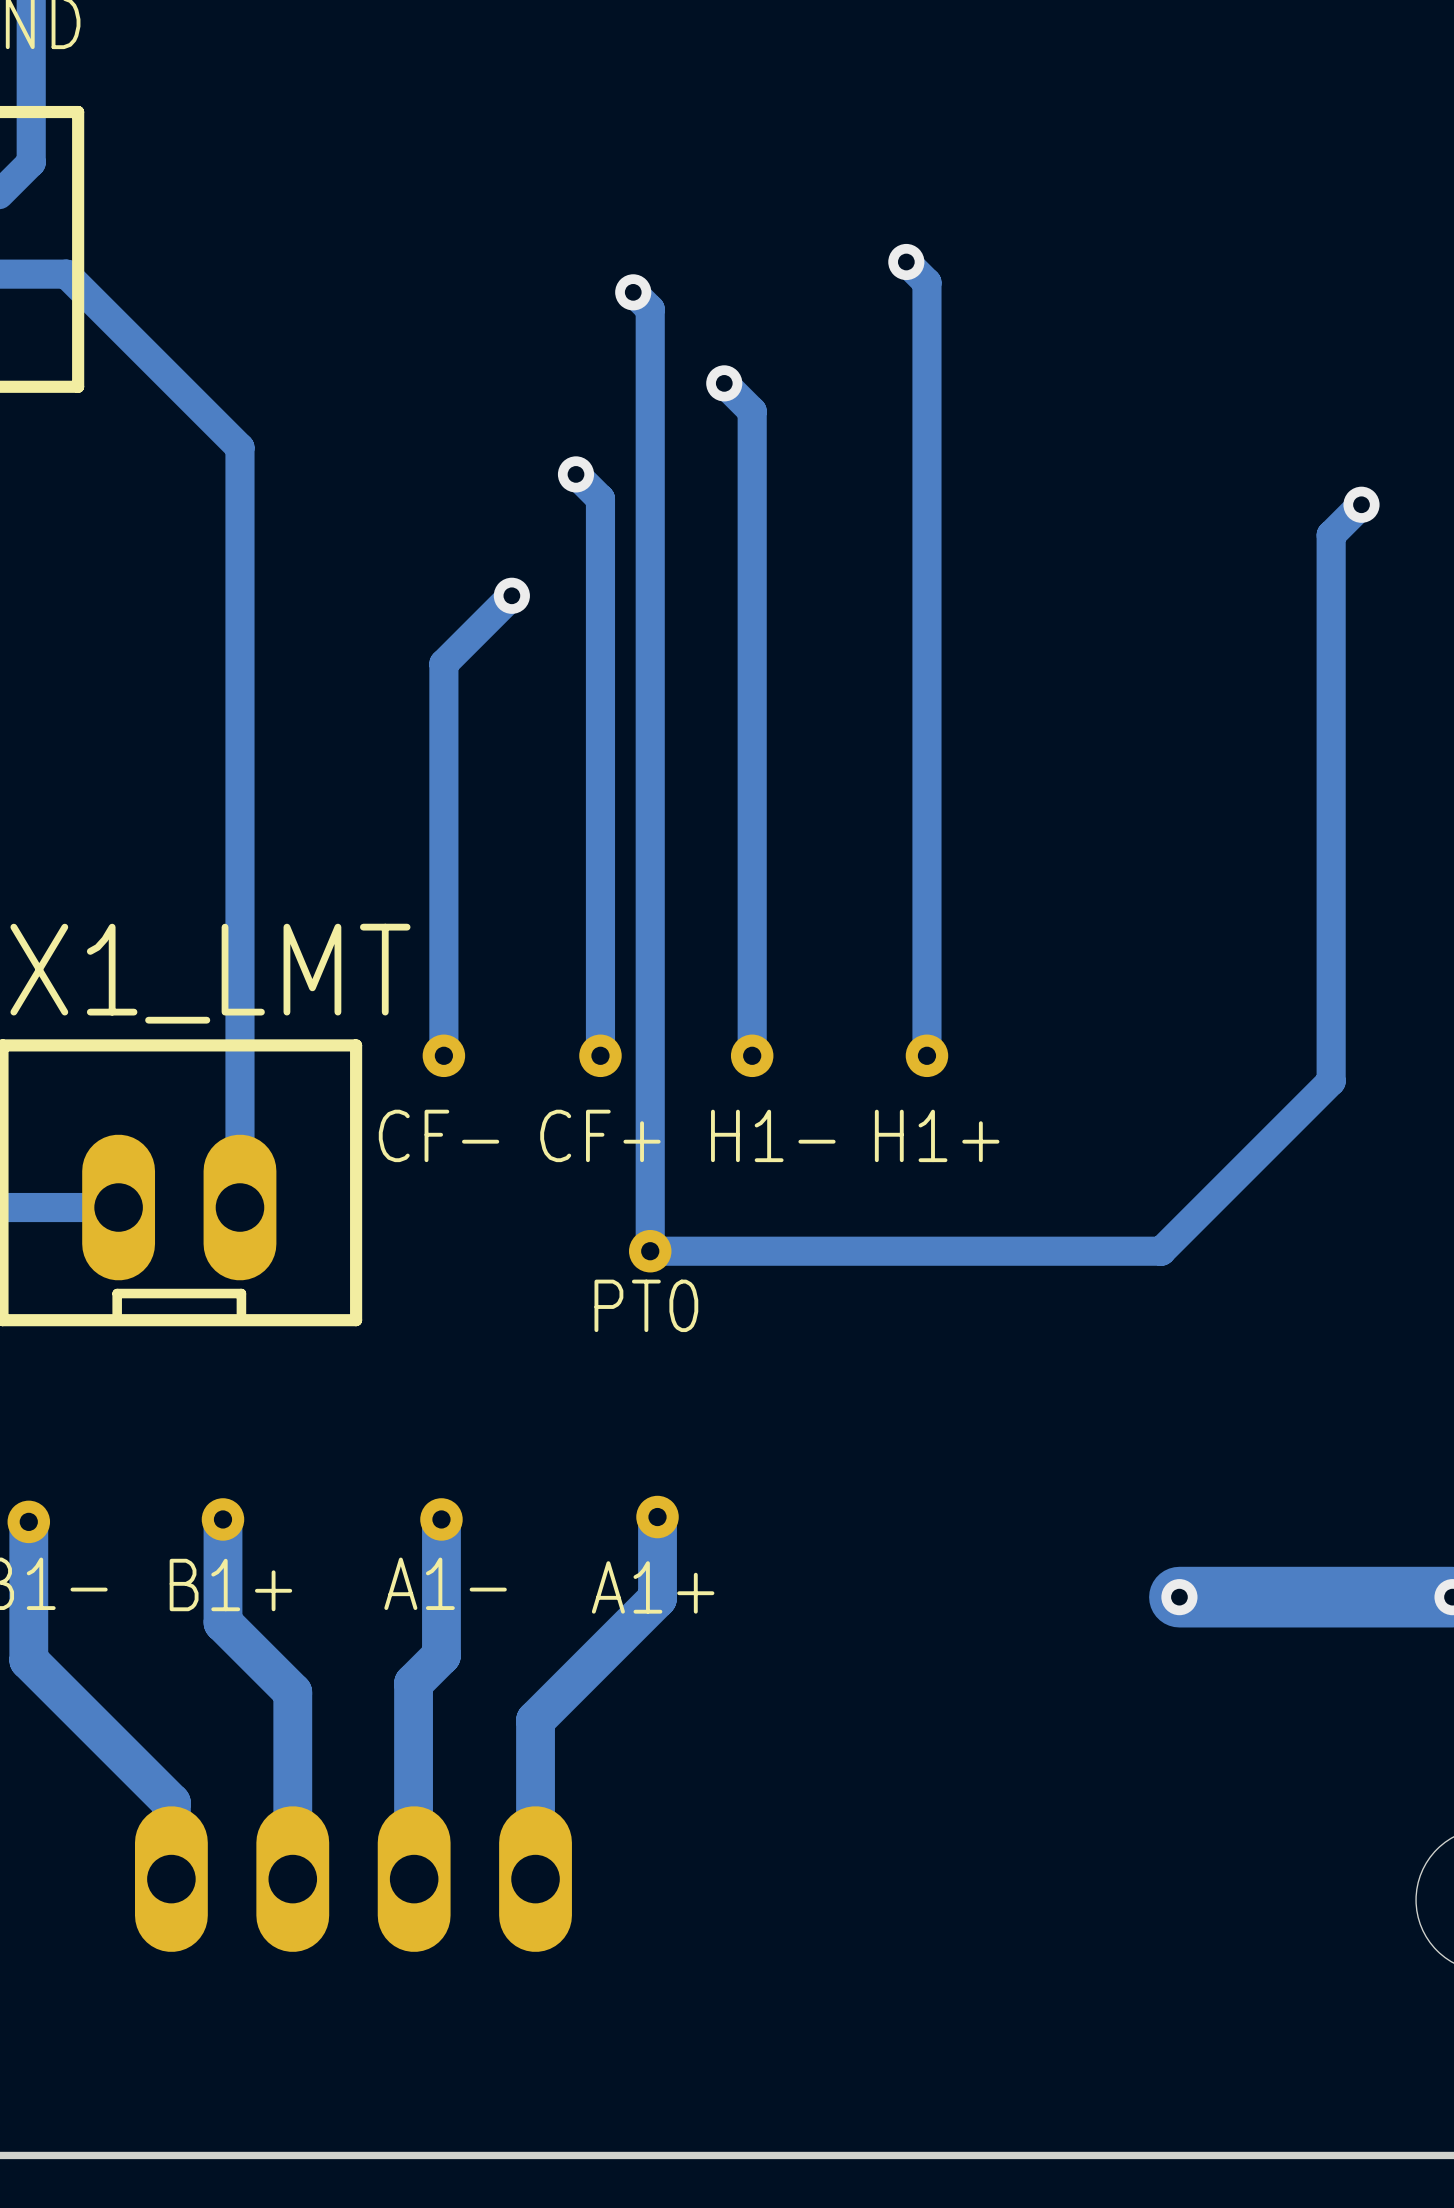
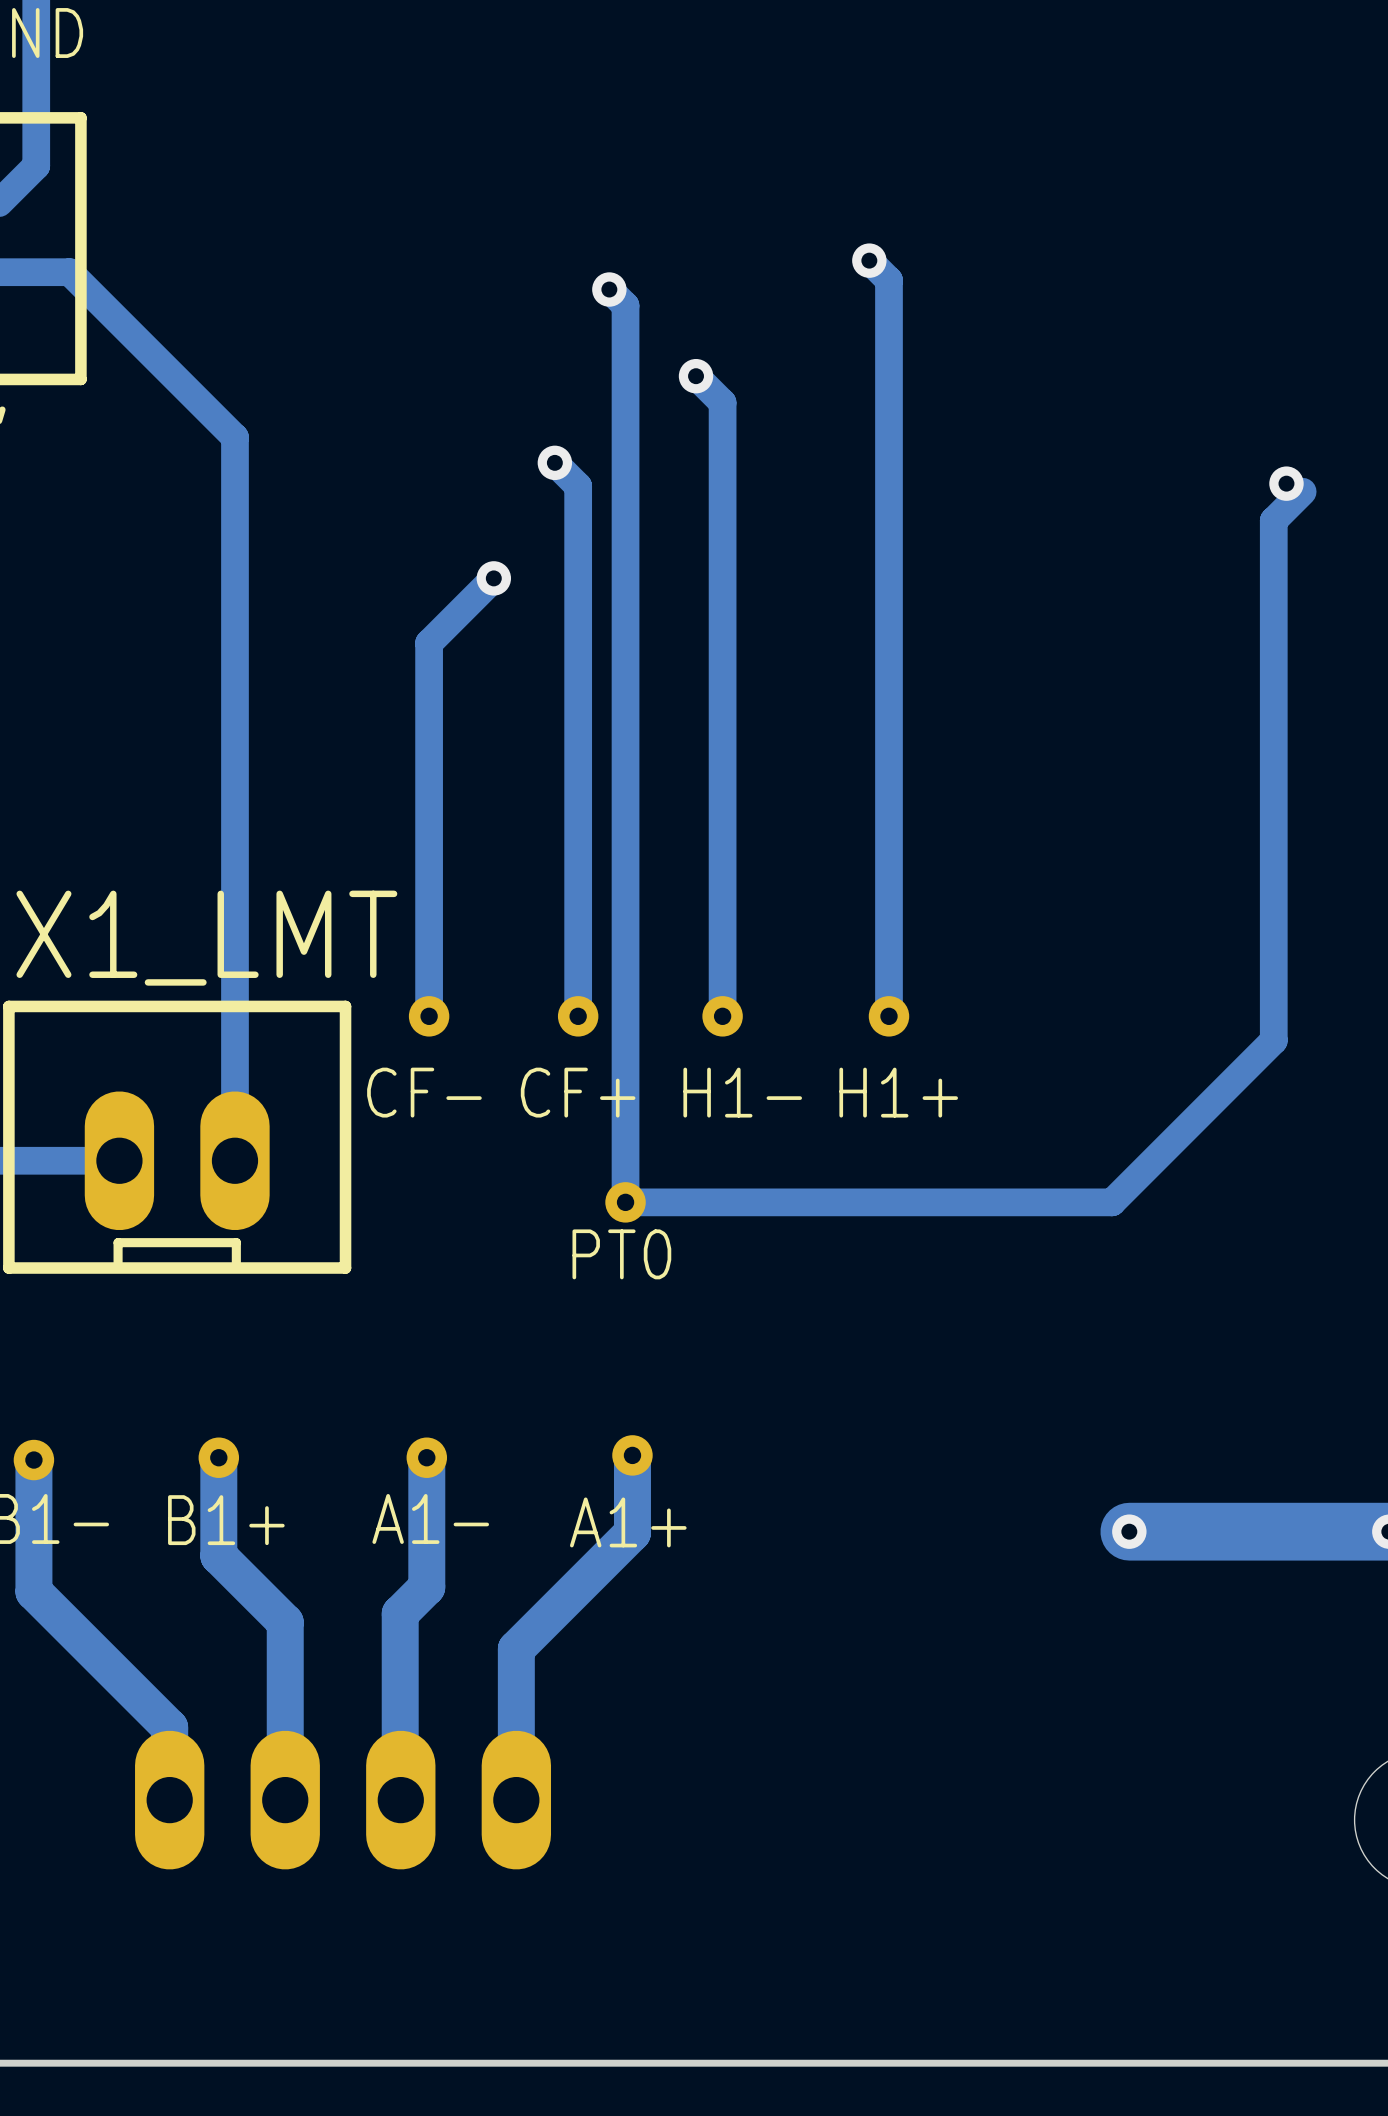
via position: (1361, 504) -> (1286, 483)

